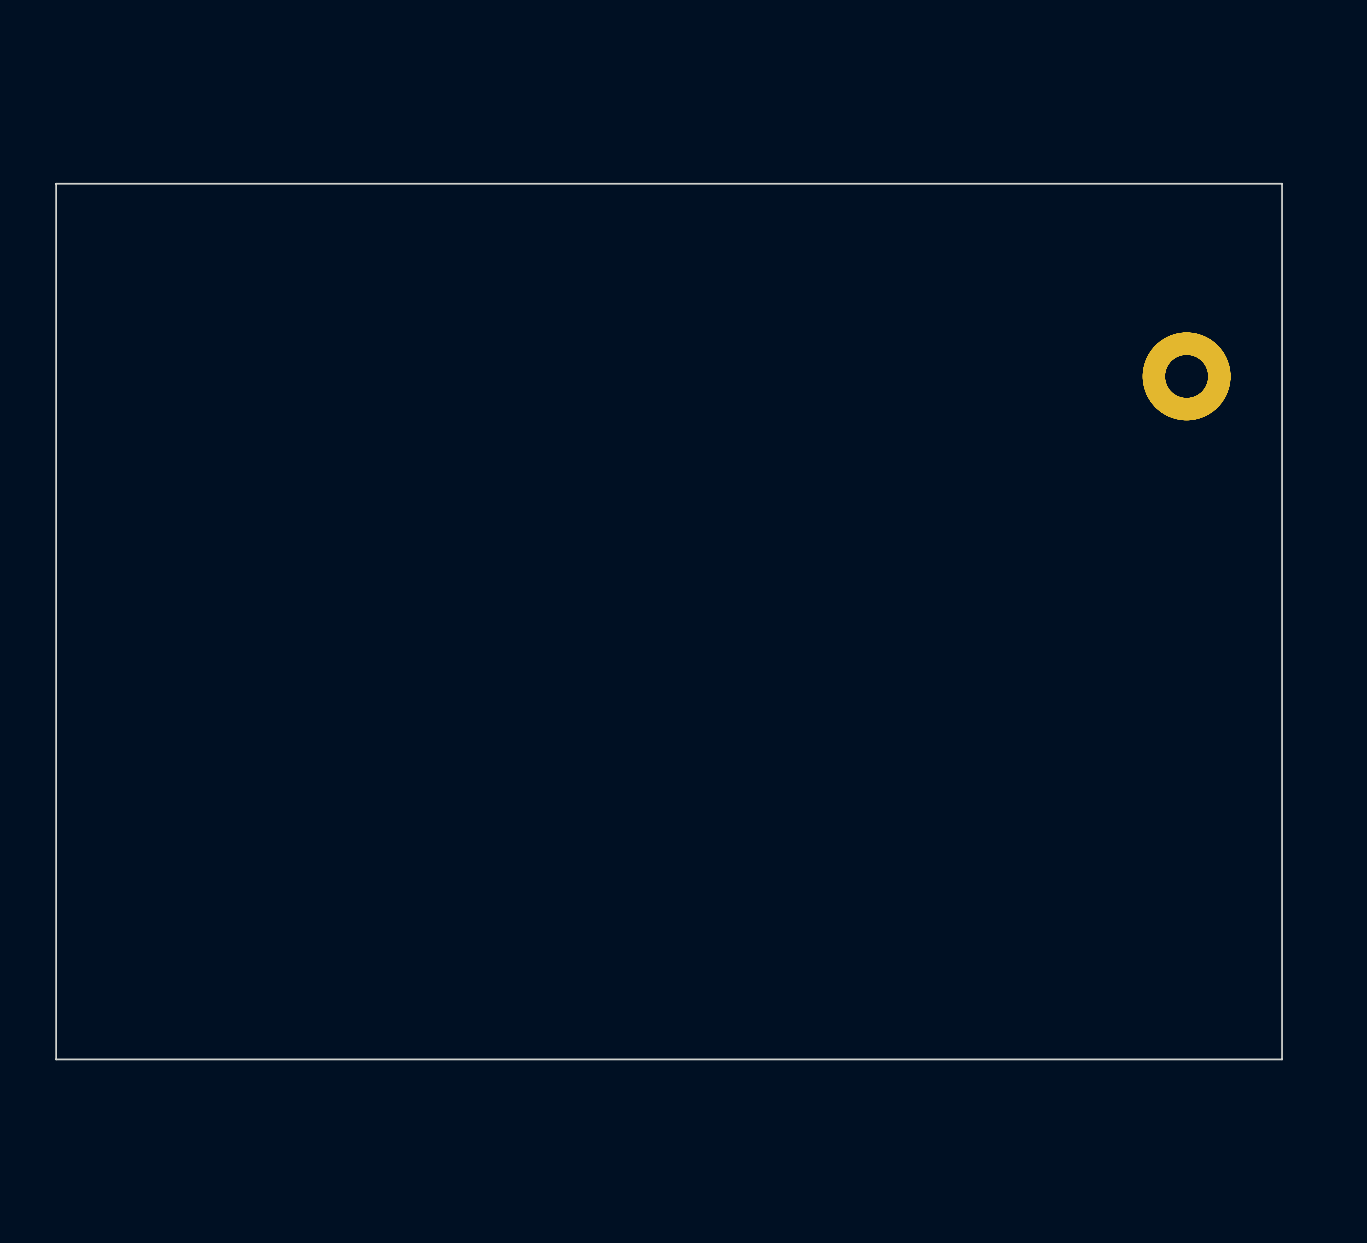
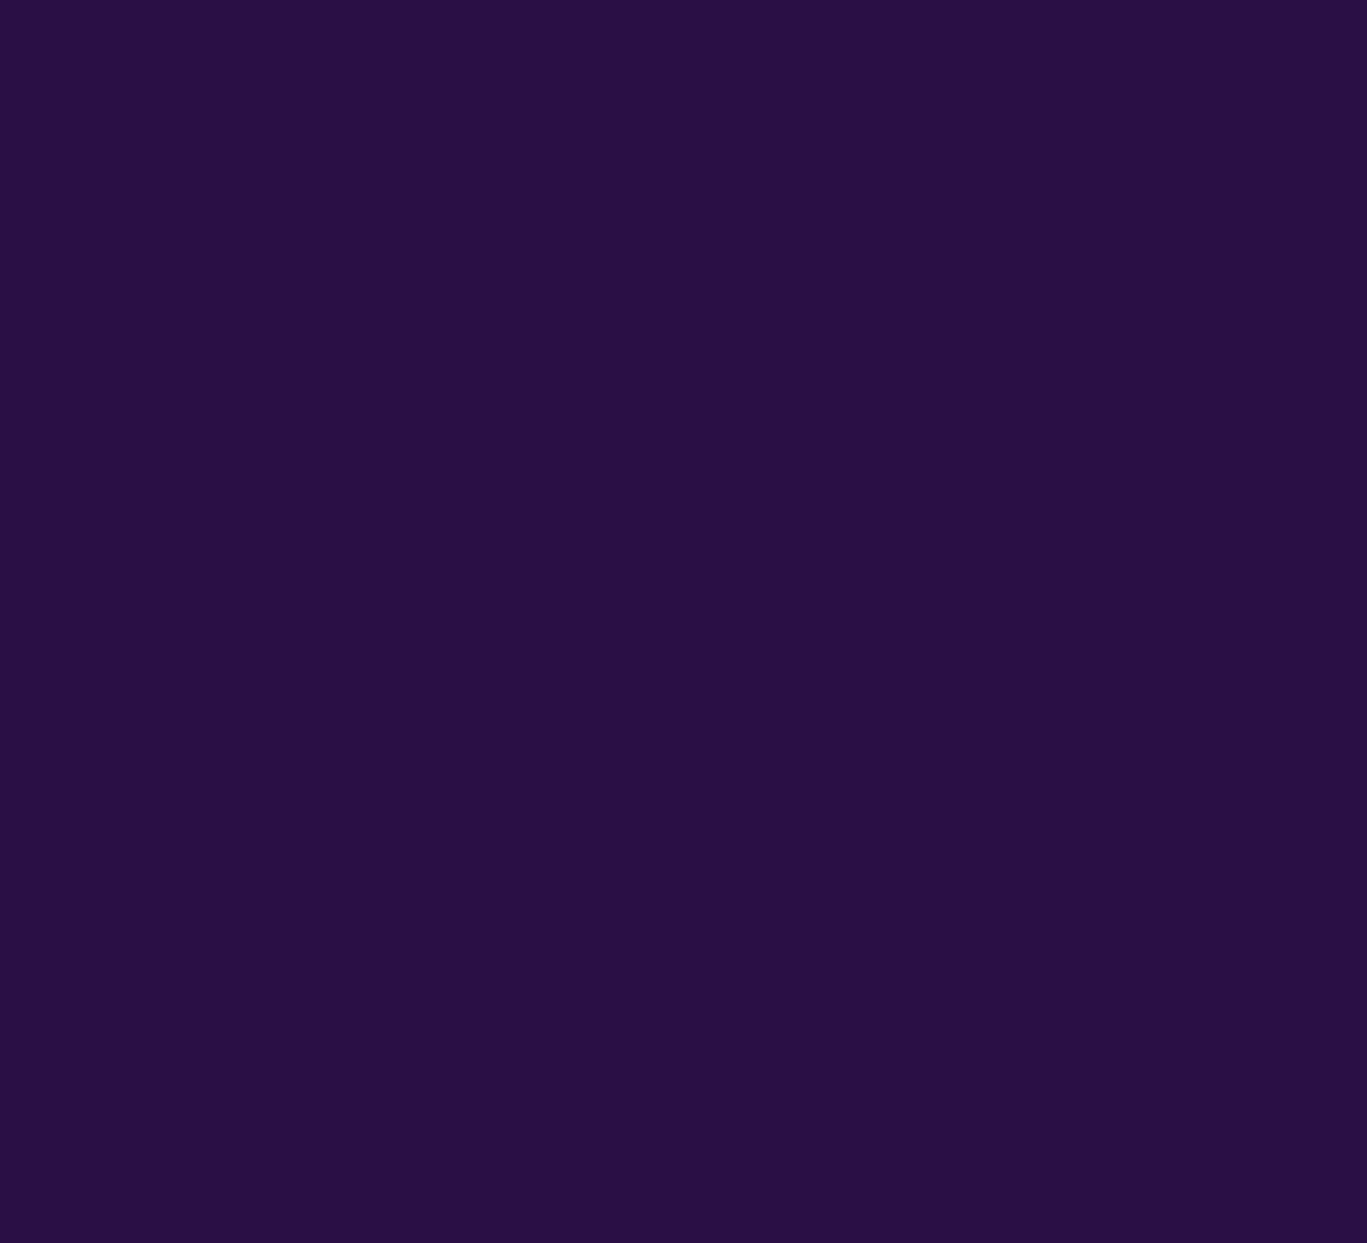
board edge: (1282, 183) (56, 183) (56, 1059) (1282, 1059) (1282, 183) -> none
part: (1186, 376) -> none

